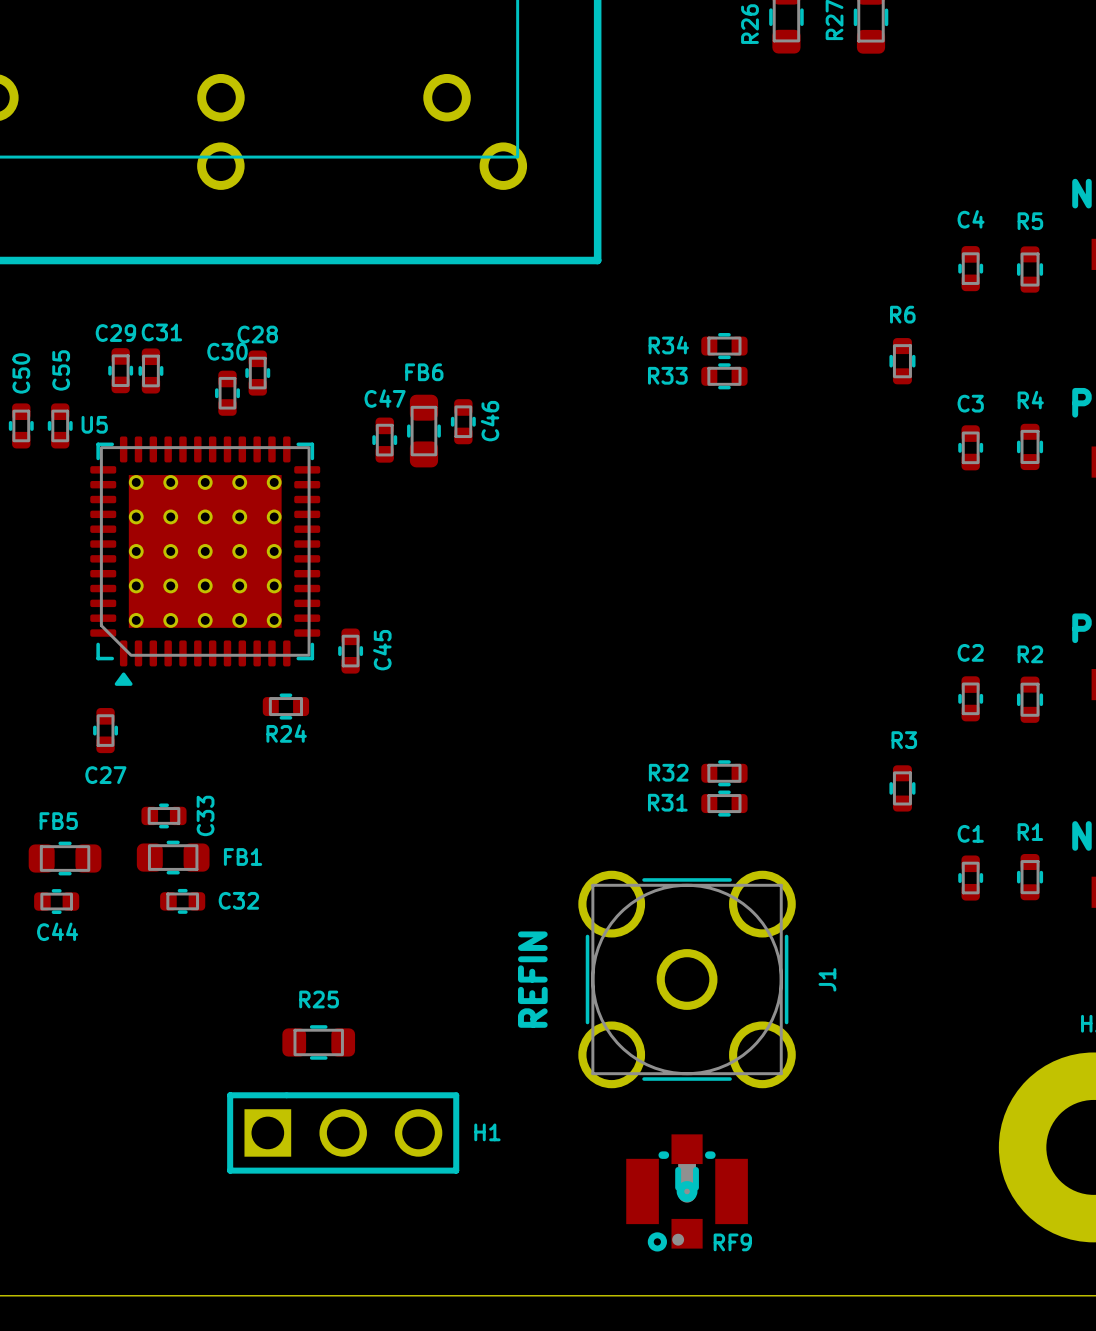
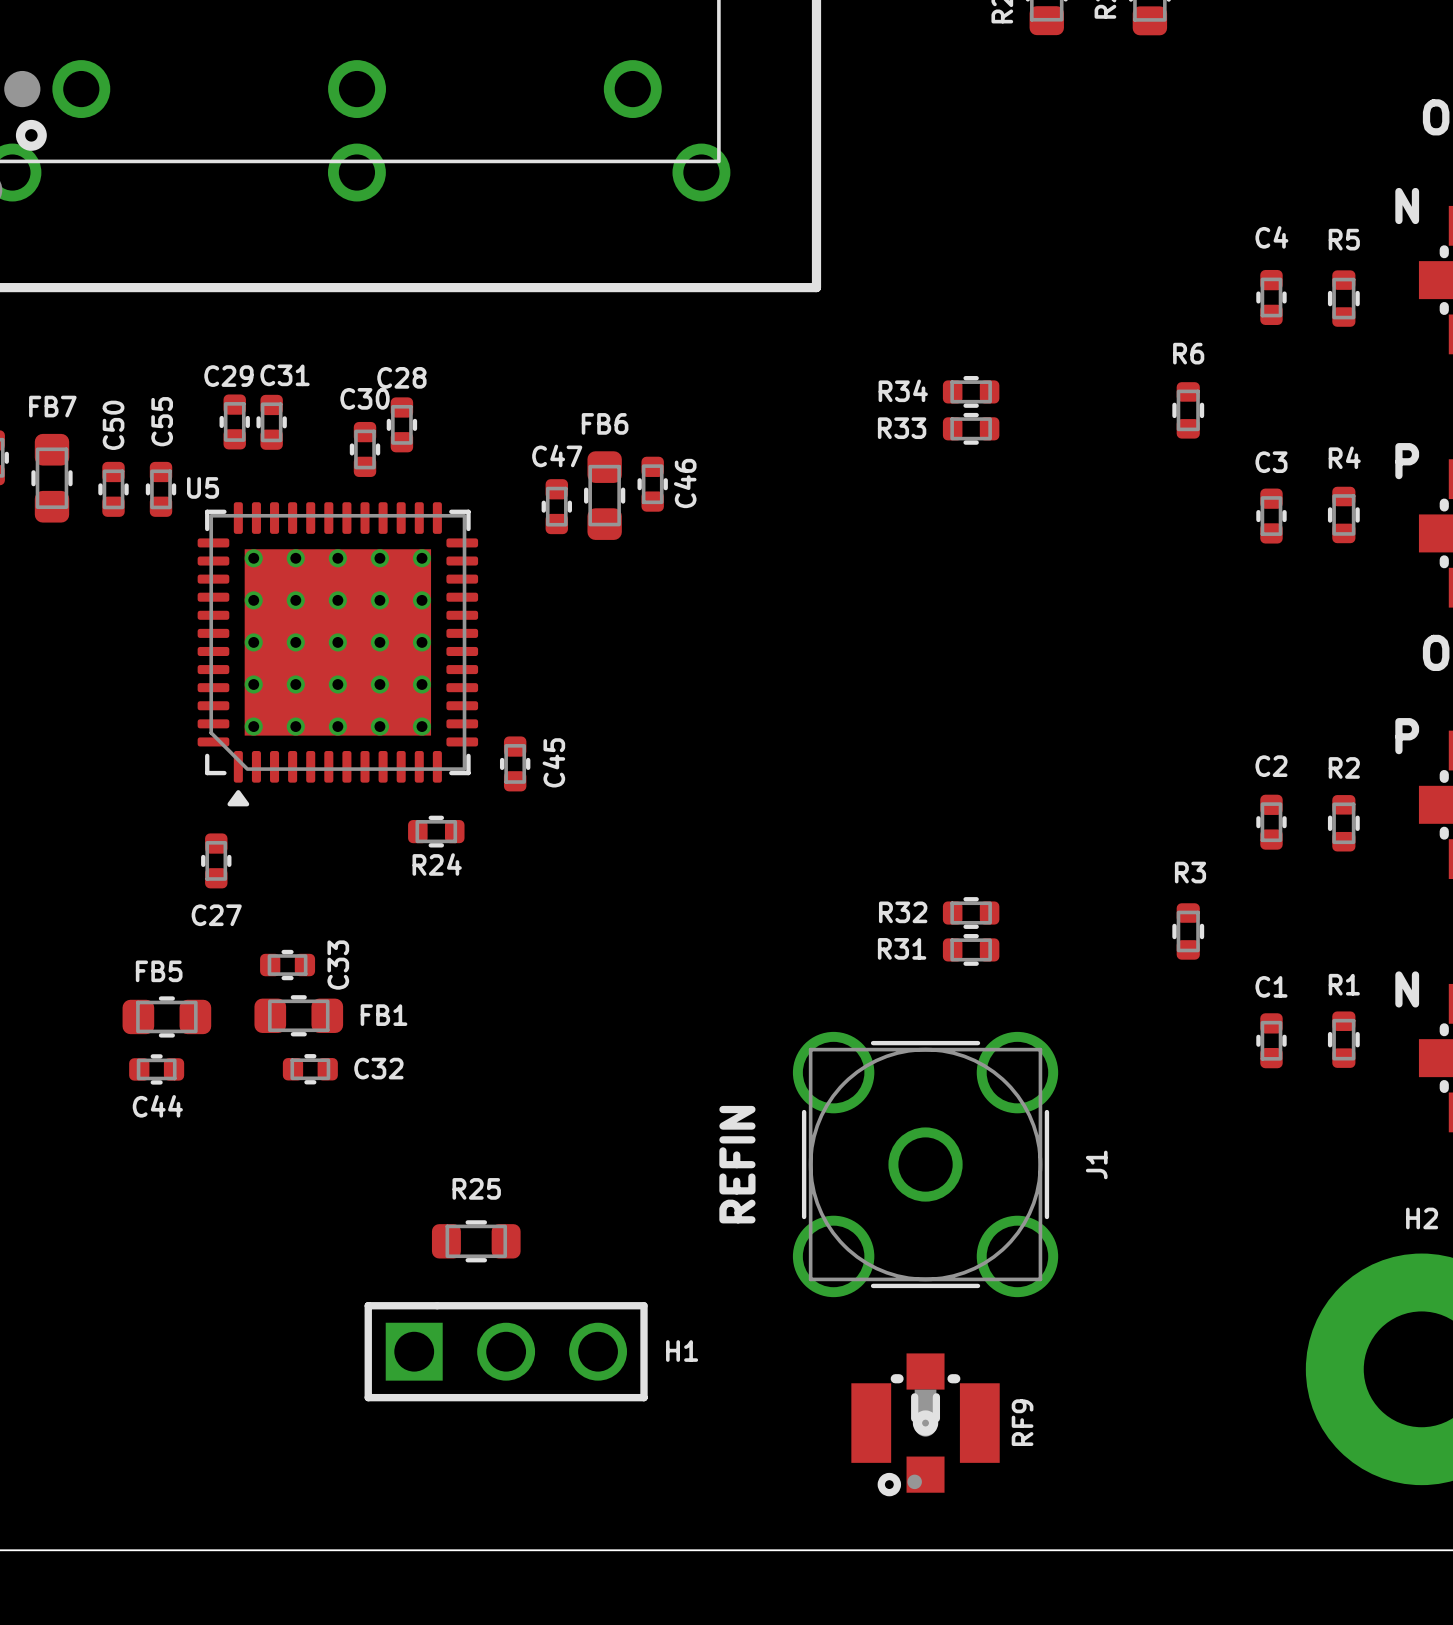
RF9 name rotation: 0° (732, 1242) -> 90° counterclockwise (1022, 1422)
RF9 name position: RF9 (732, 1242) -> RF9 (1022, 1422)

